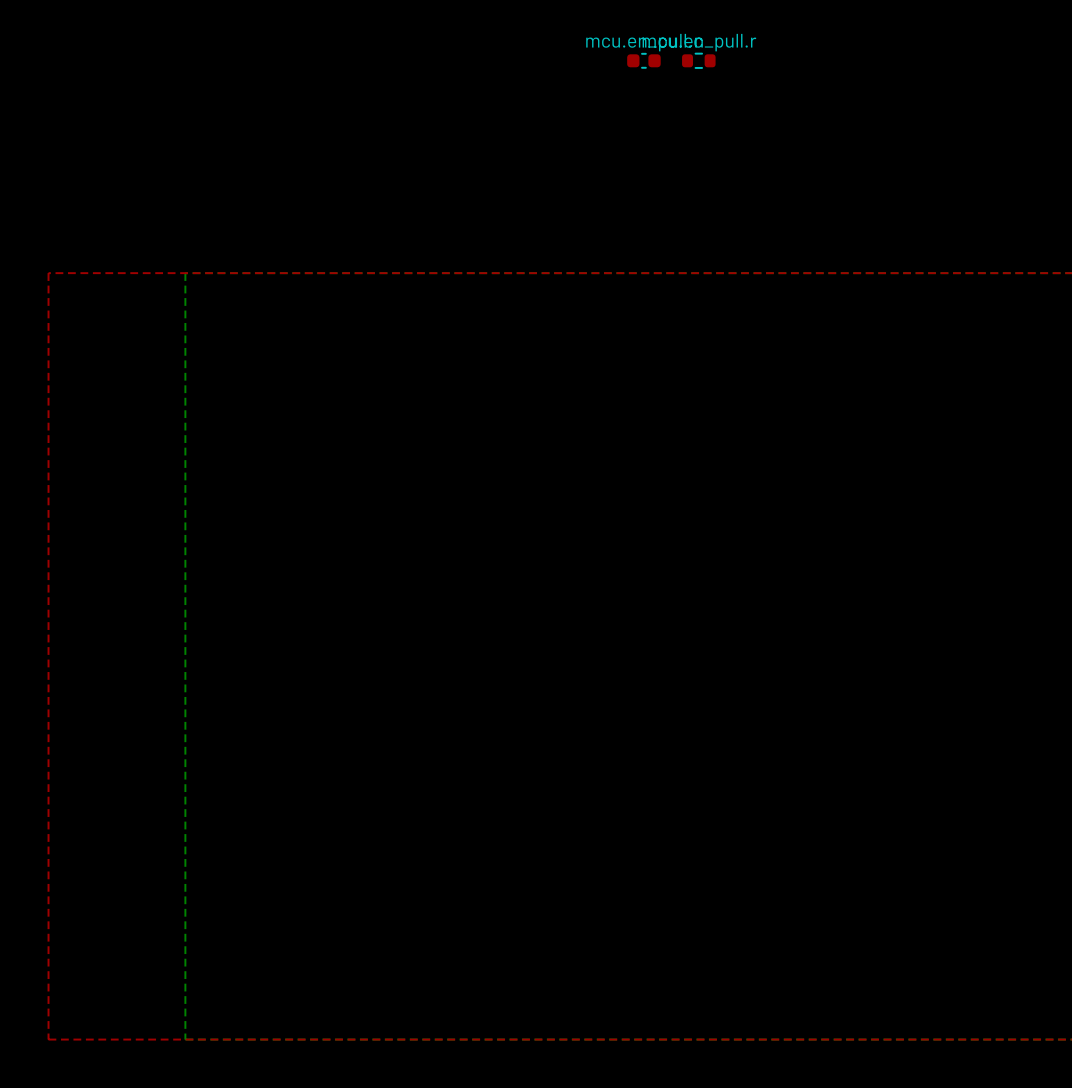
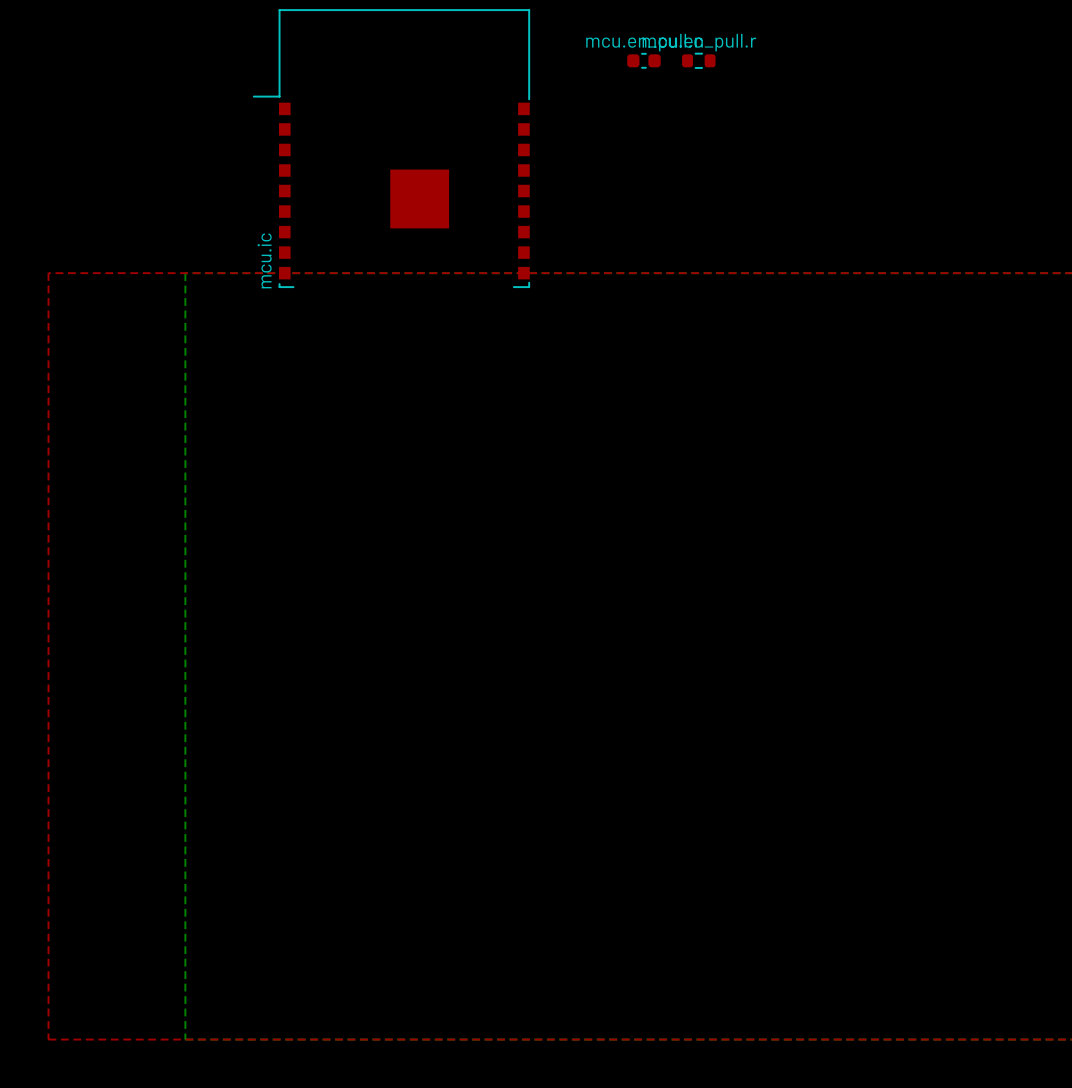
mcu.ic: none -> (391, 148)

